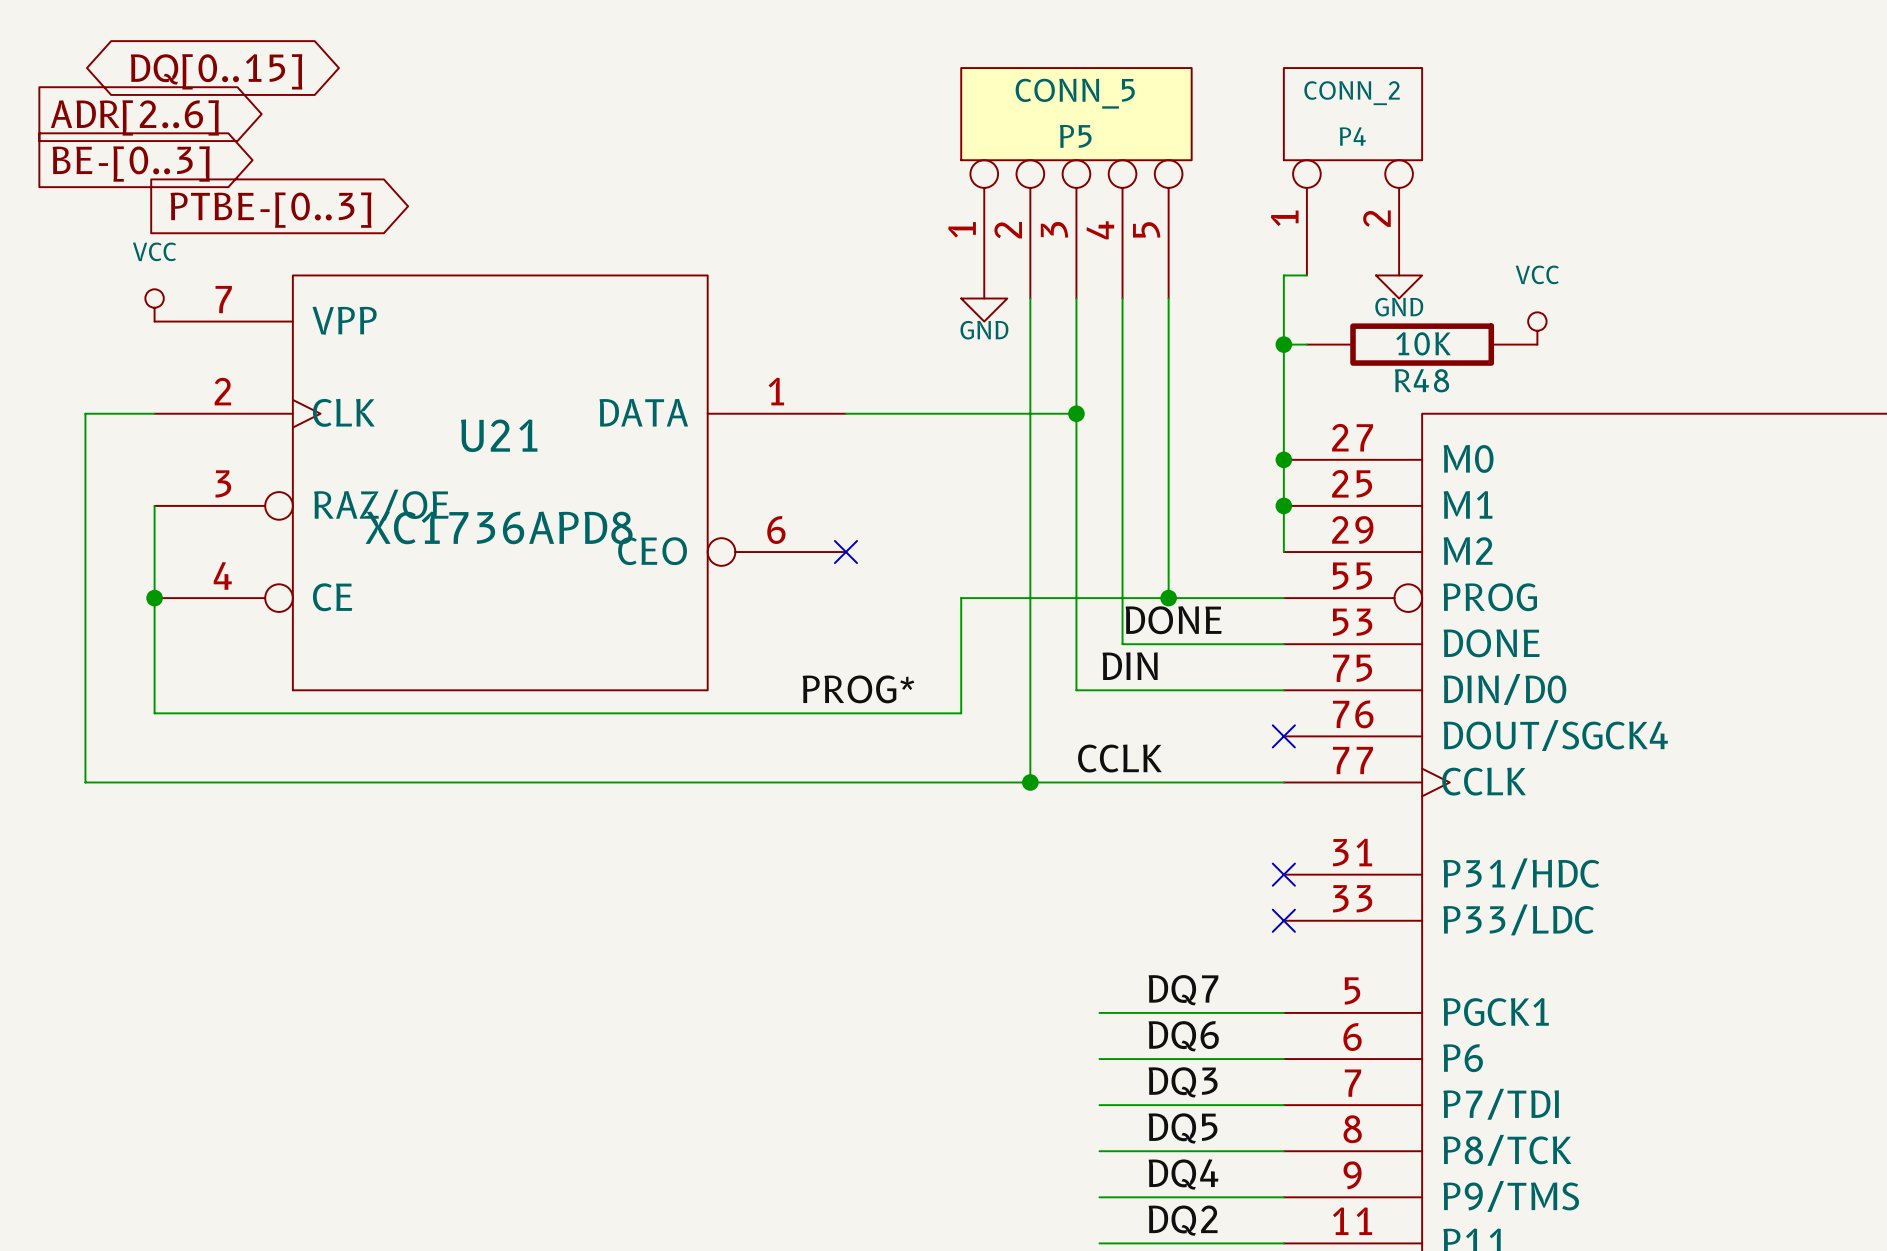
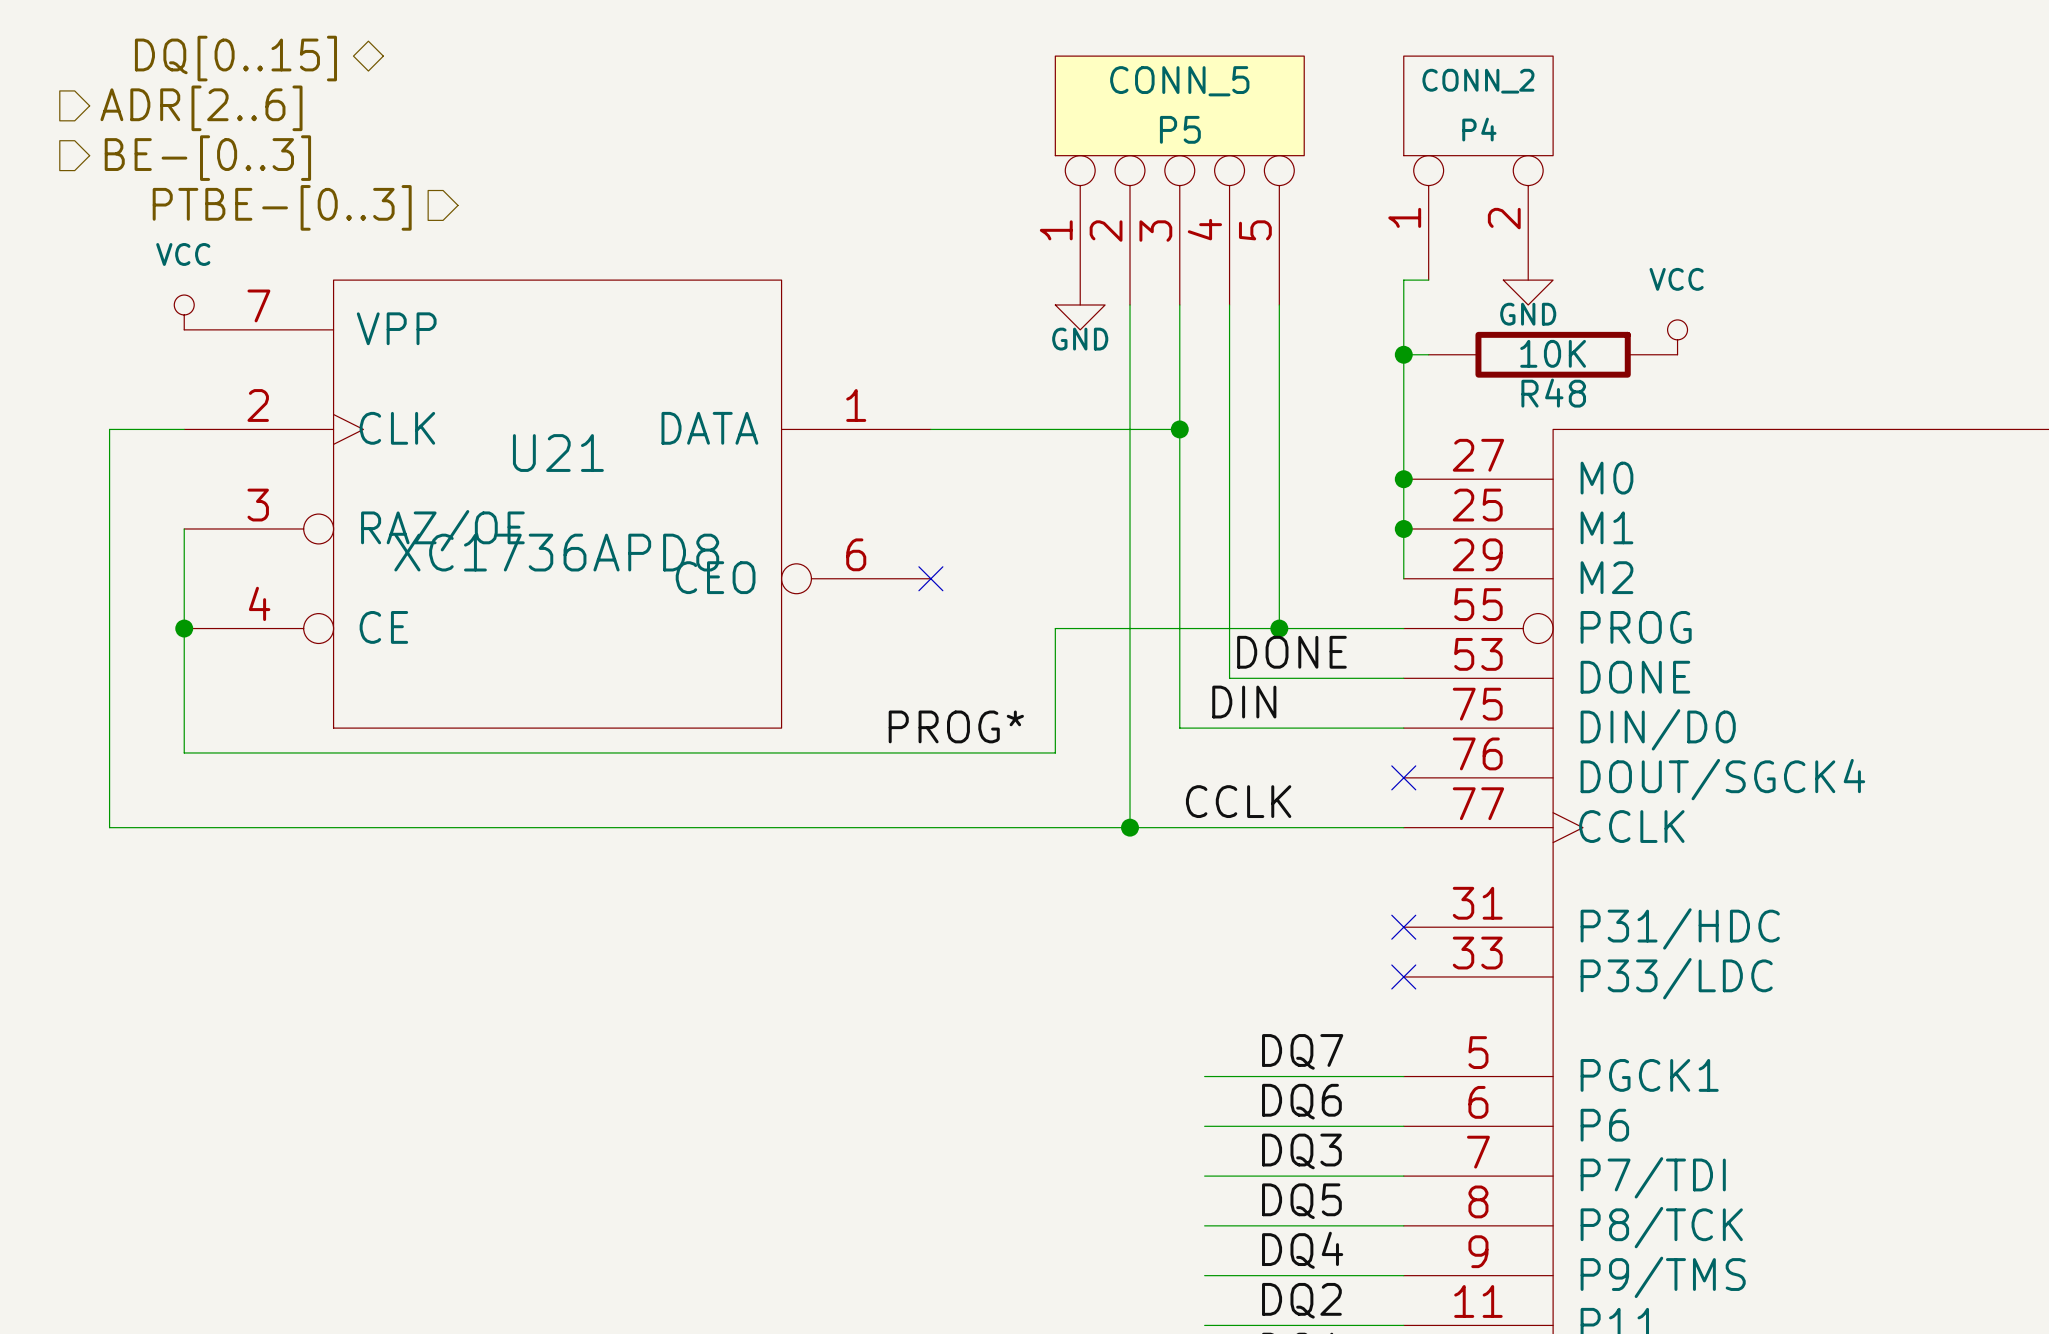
hierarchical label: none -> DQ[0..15] (235, 58)
global label: DQ[0..15] (216, 71) -> none
hierarchical label: none -> ADR[2..6] (201, 108)
global label: ADR[2..6] (134, 117) -> none
hierarchical label: none -> BE-[0..3] (207, 158)
global label: BE-[0..3] (131, 164) -> none
hierarchical label: none -> PTBE-[0..3] (282, 207)
global label: PTBE-[0..3] (271, 210) -> none

